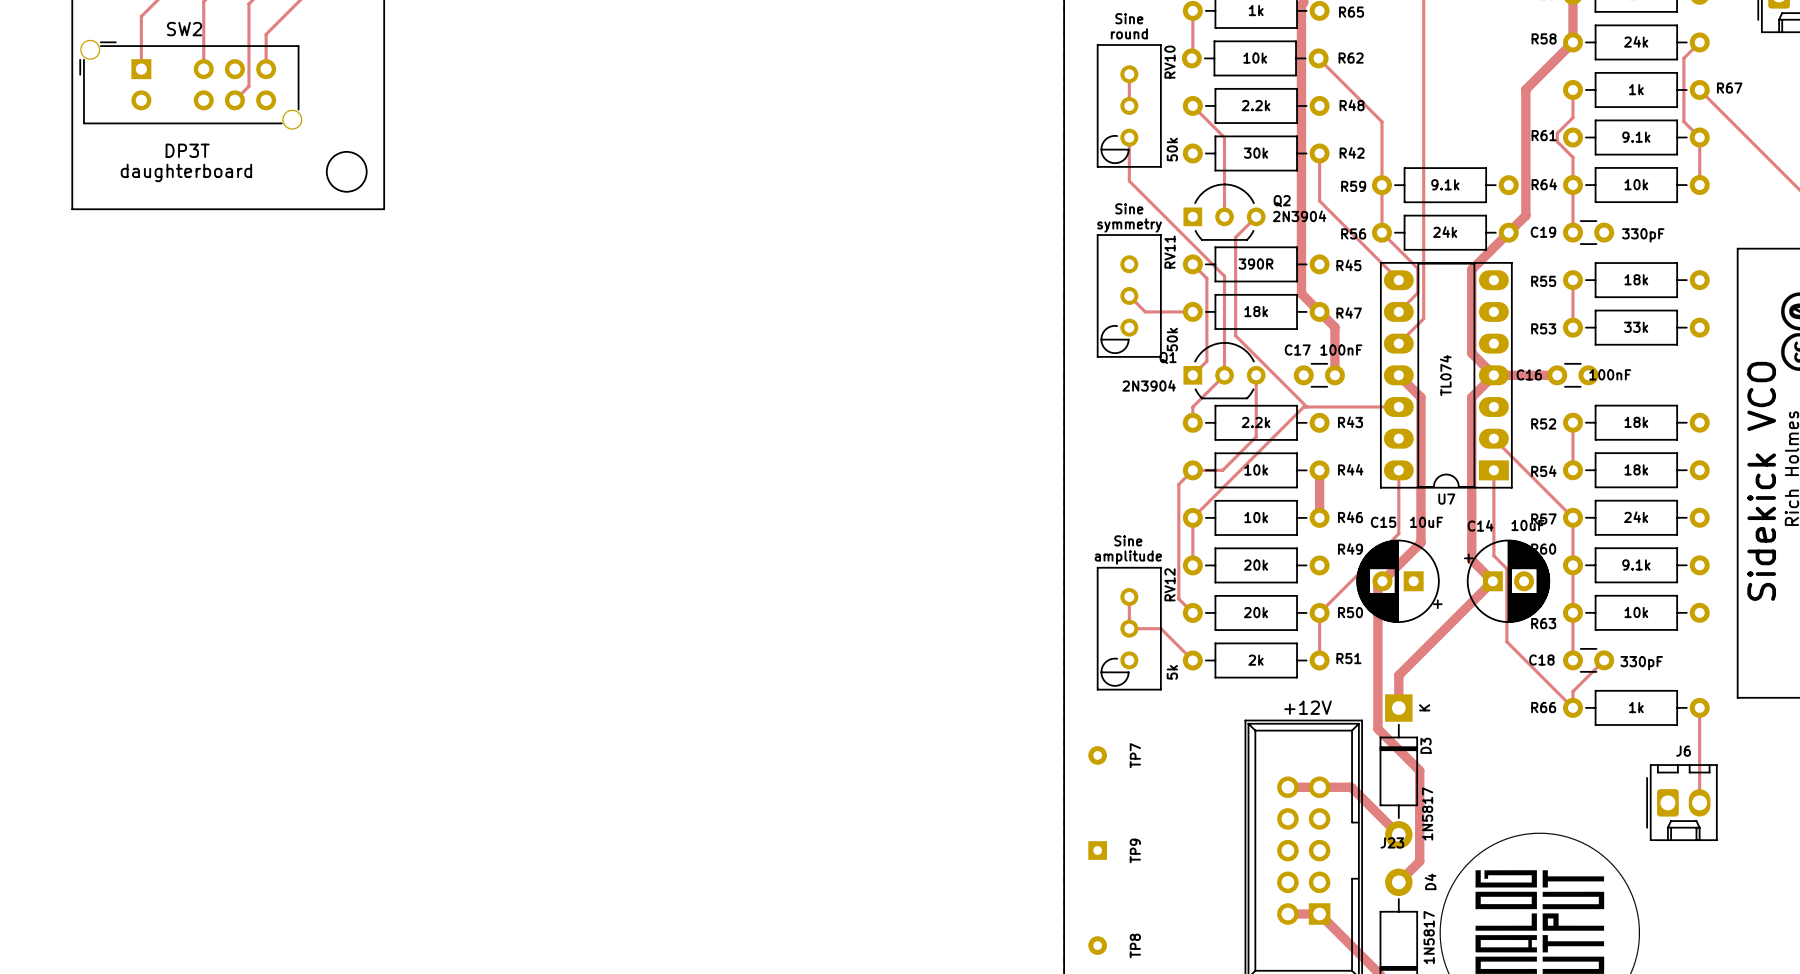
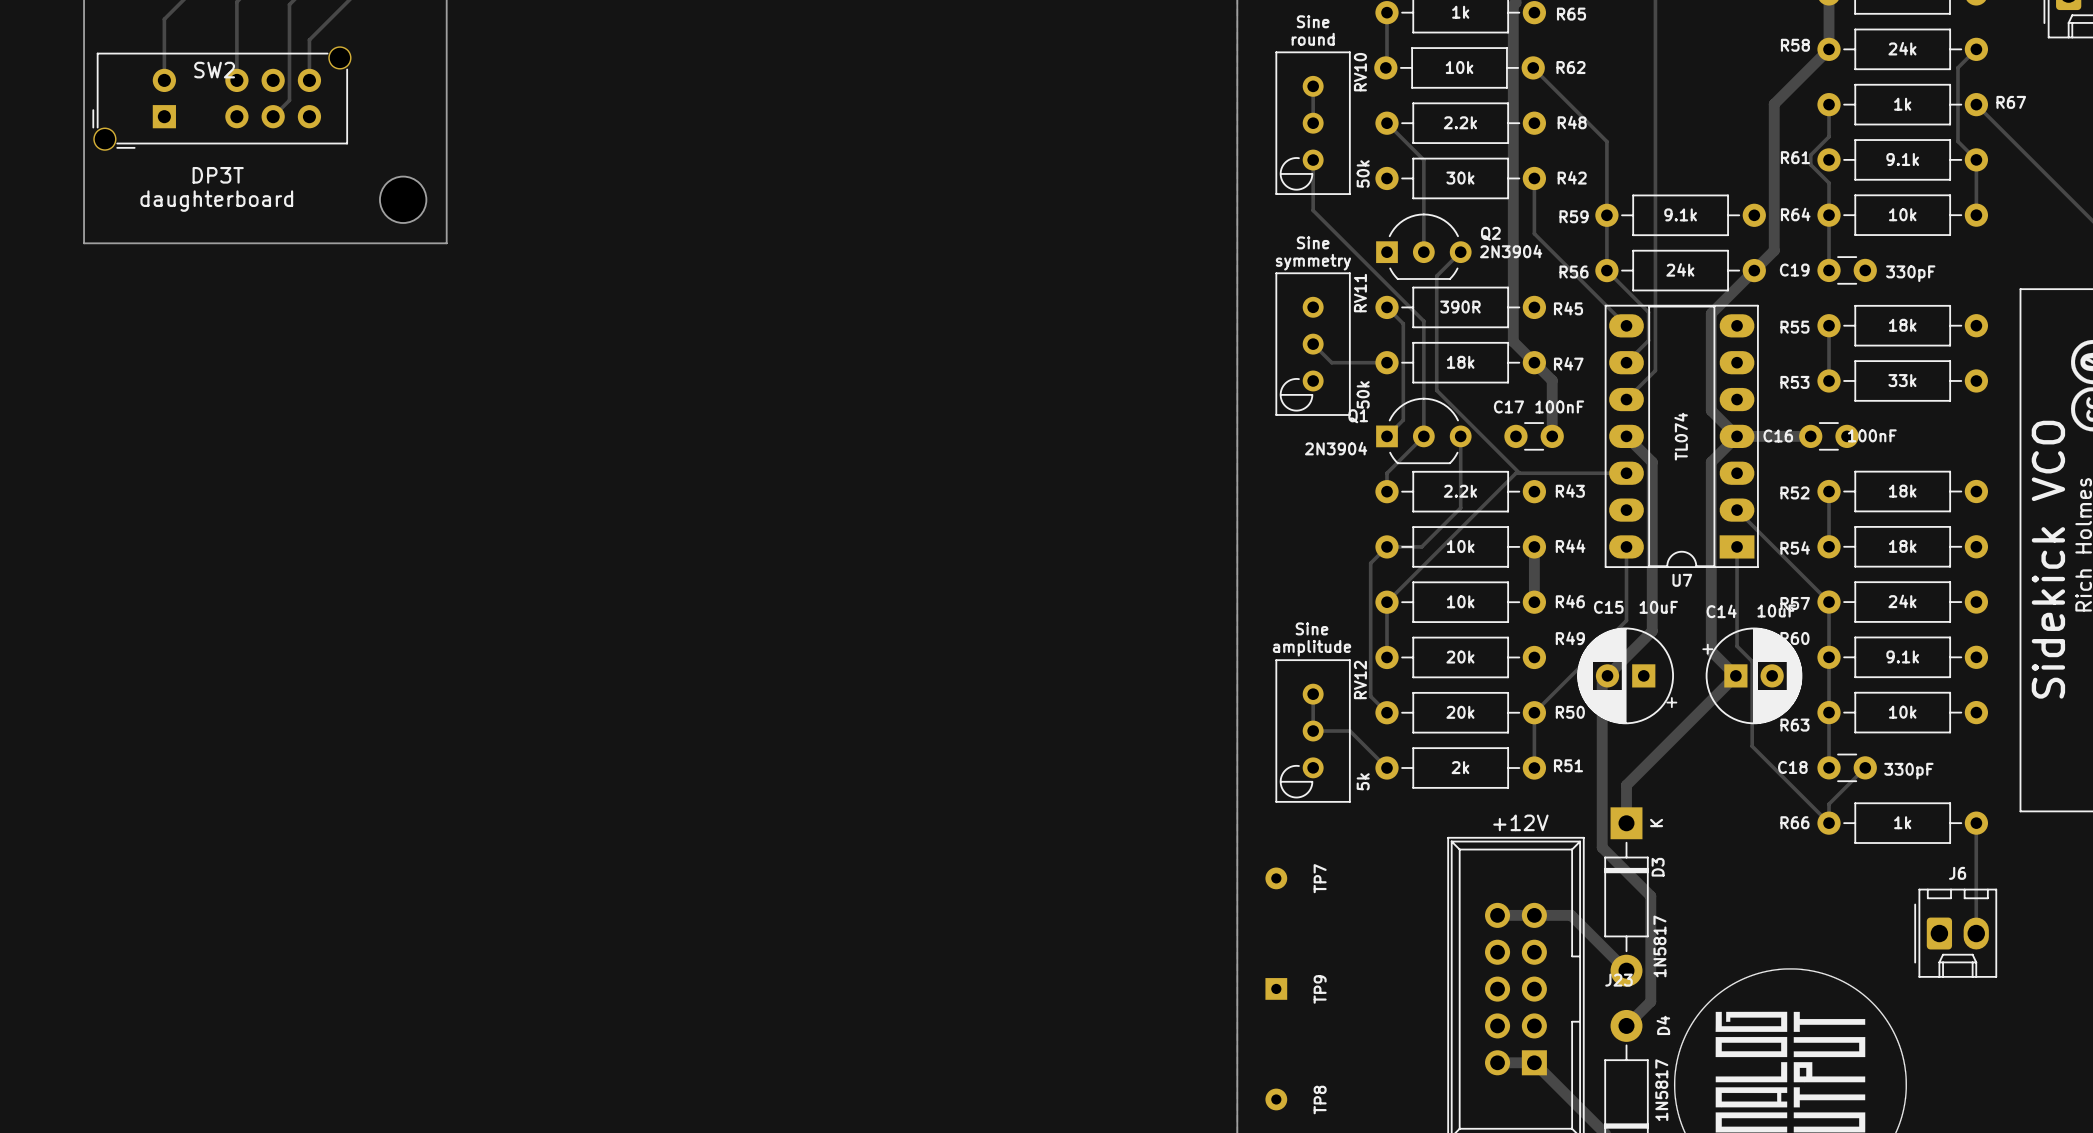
SW2 name position: SW2 (184, 29) -> SW2 (214, 70)
SW2 footprint: [79, 39, 303, 130] -> [92, 46, 352, 151]

